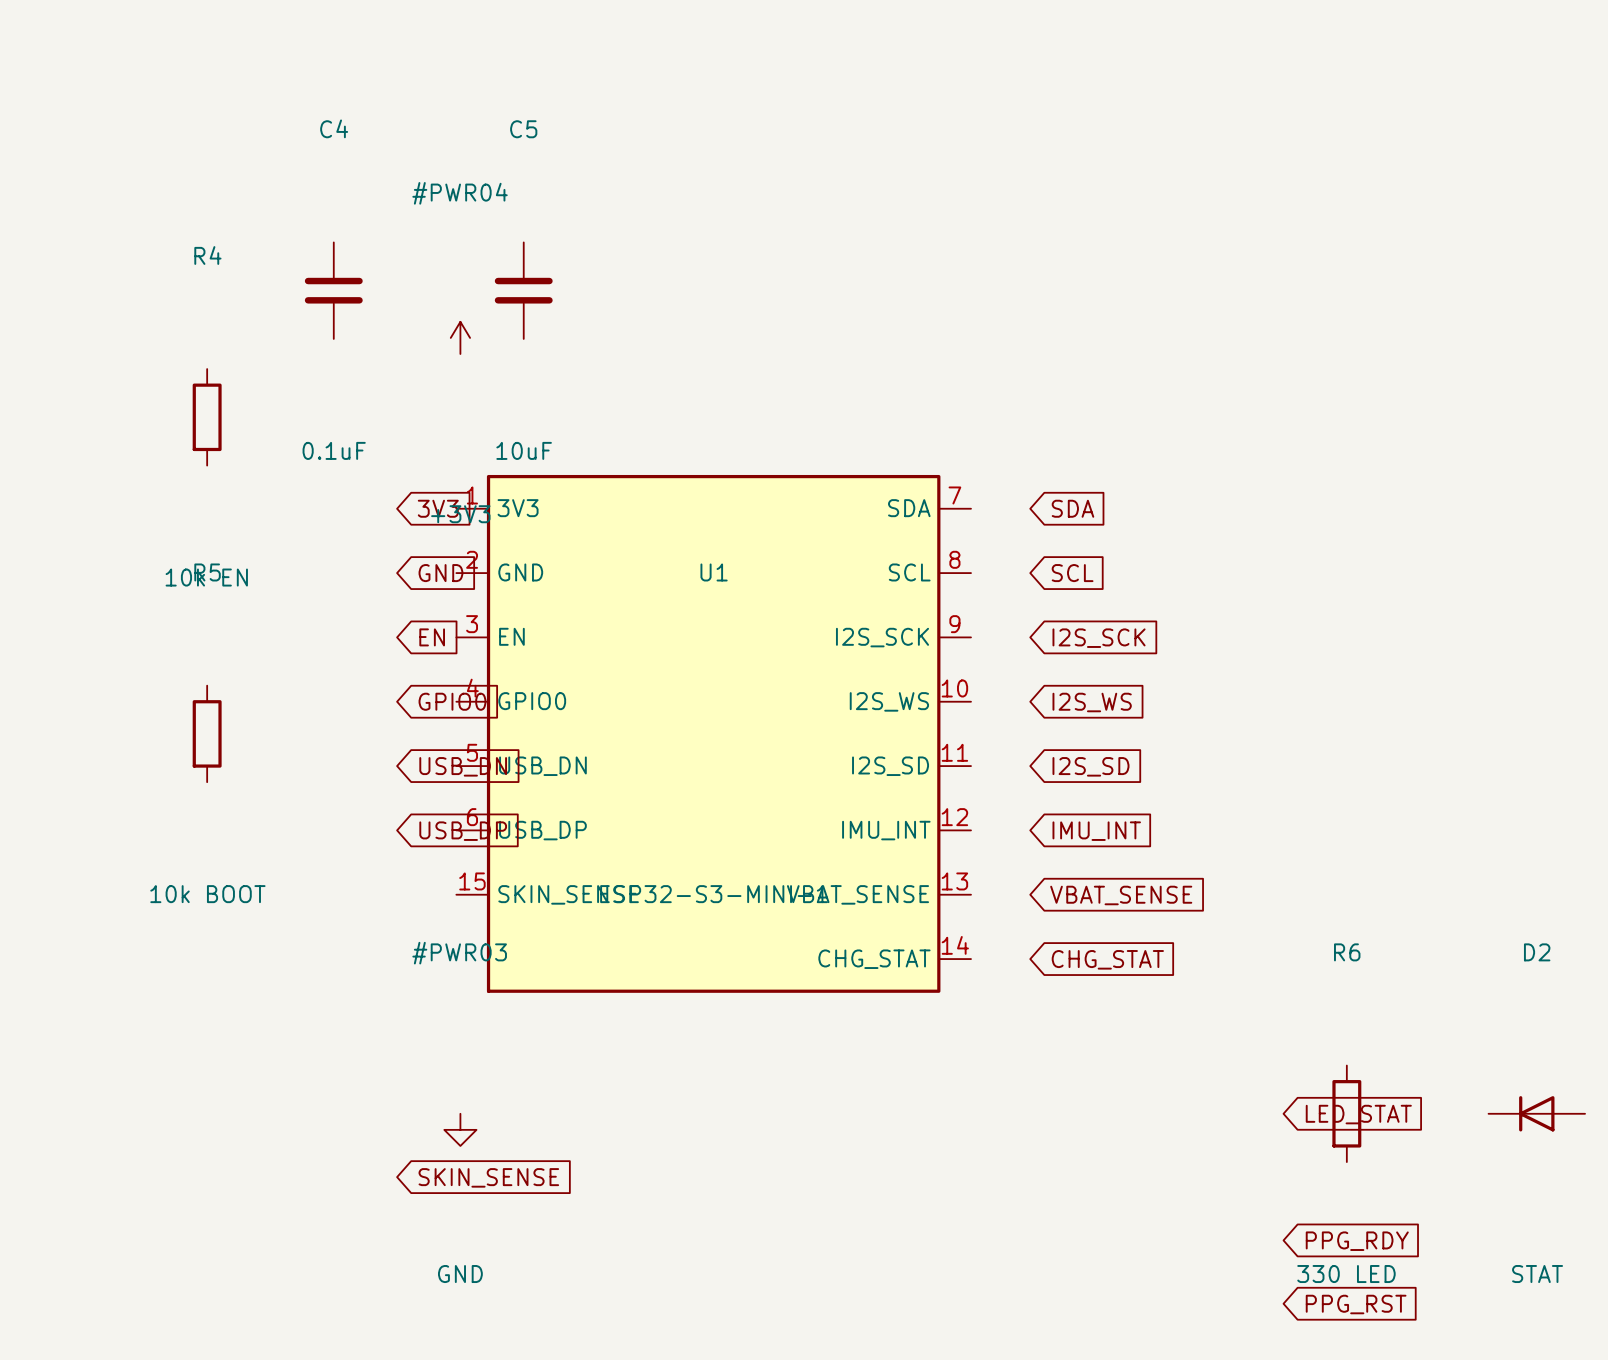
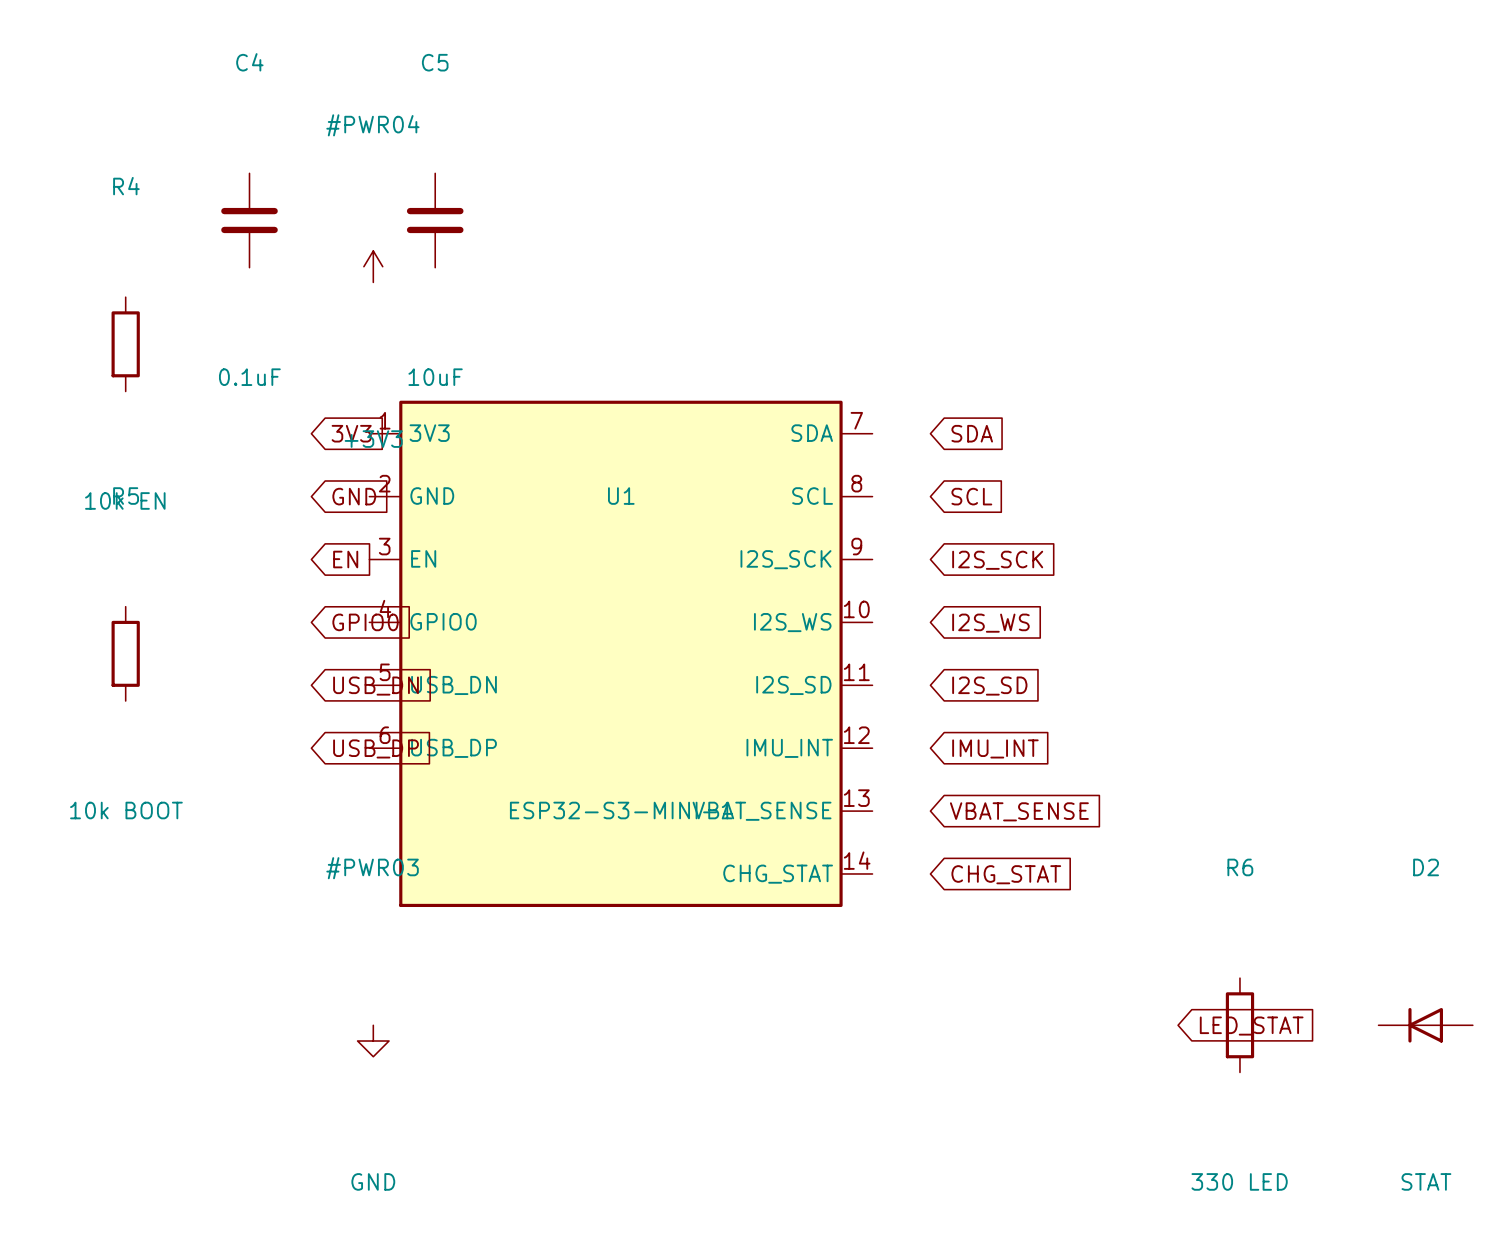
U1 symbol: [456, 474, 972, 993] -> [369, 400, 873, 908]
global label: SKIN_SENSE (488, 1177) -> none
global label: PPG_RDY (1357, 1241) -> none
global label: PPG_RST (1356, 1304) -> none

